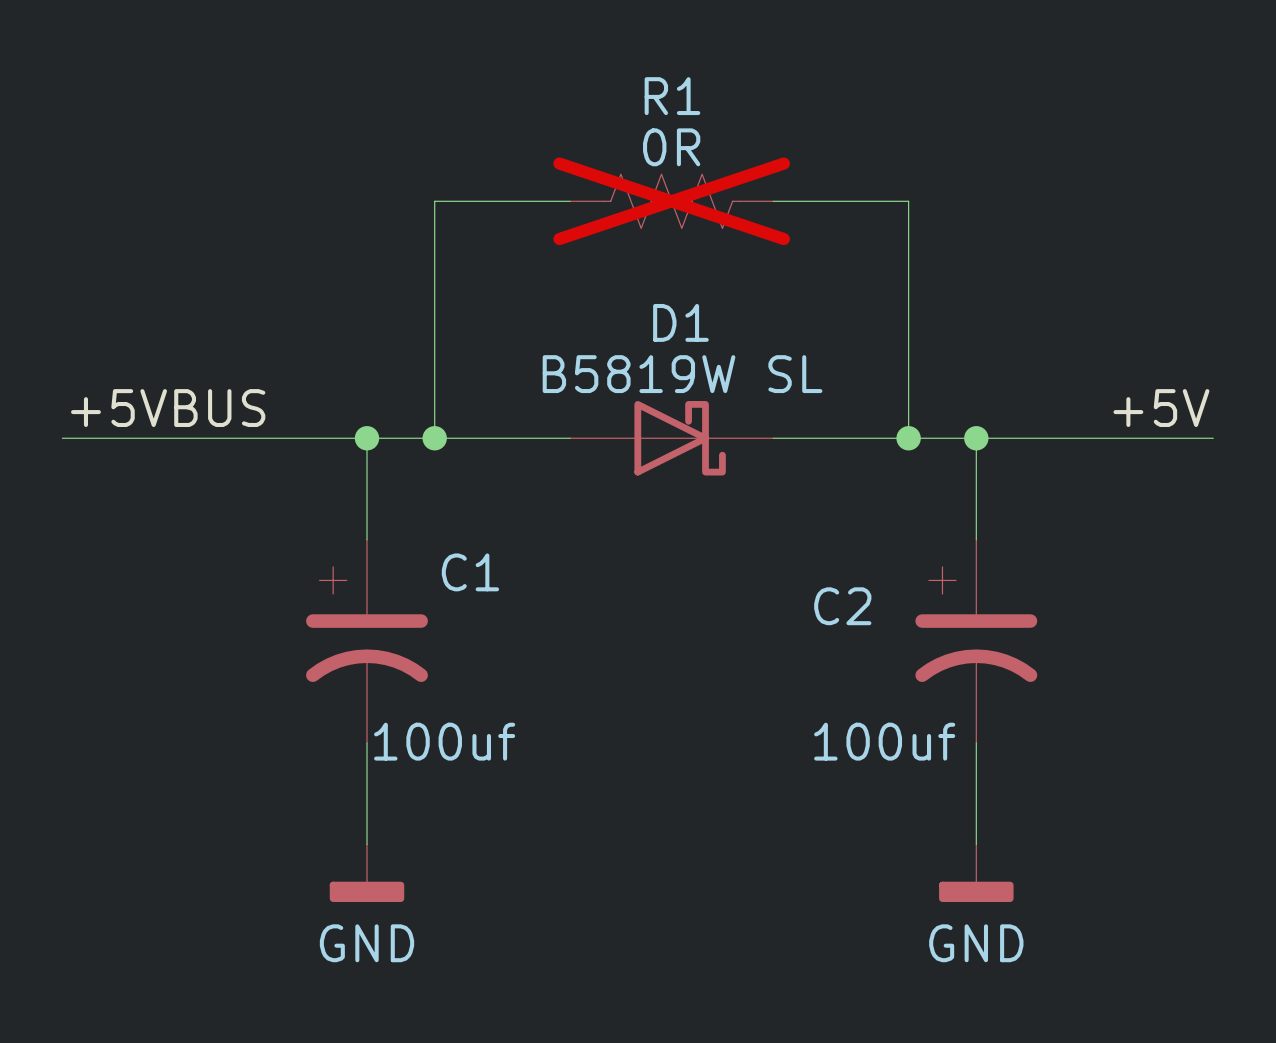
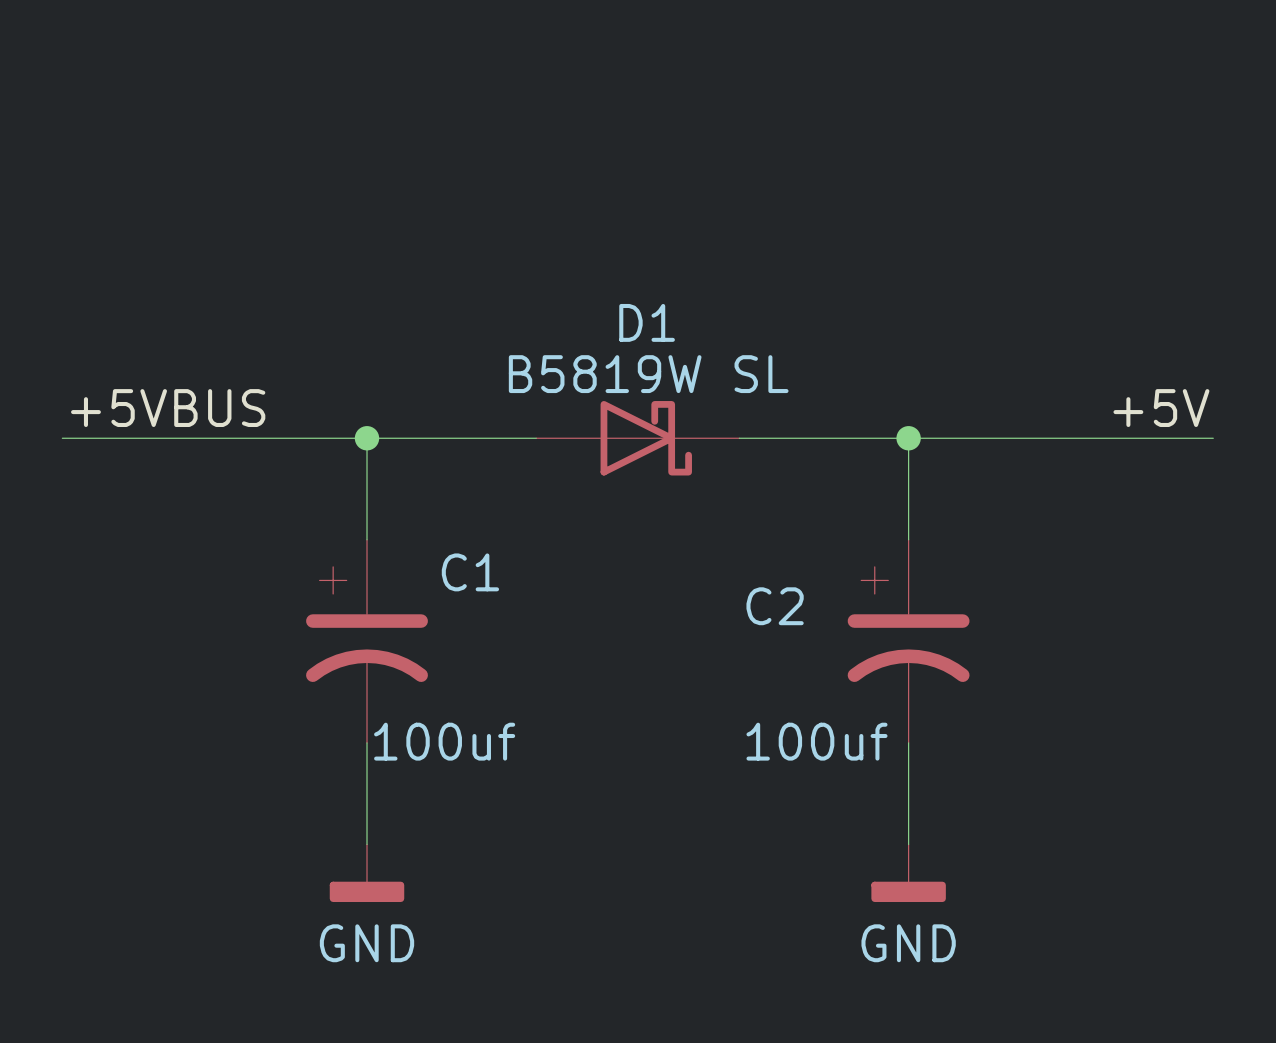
wire: (570, 201) (434, 201) (434, 438) -> none
R1: 0R (671, 201) -> none
wire: (773, 201) (908, 201) (908, 438) -> (908, 539) (908, 438)
junction: (434, 438) -> none
D1 position: (671, 438) -> (637, 438)
wire: (976, 438) (976, 539) -> none
junction: (976, 438) -> none
C2 position: (976, 641) -> (908, 641)
wire: (976, 742) (976, 844) -> (908, 742) (908, 844)
power symbol position: GND (976, 873) -> GND (908, 873)

